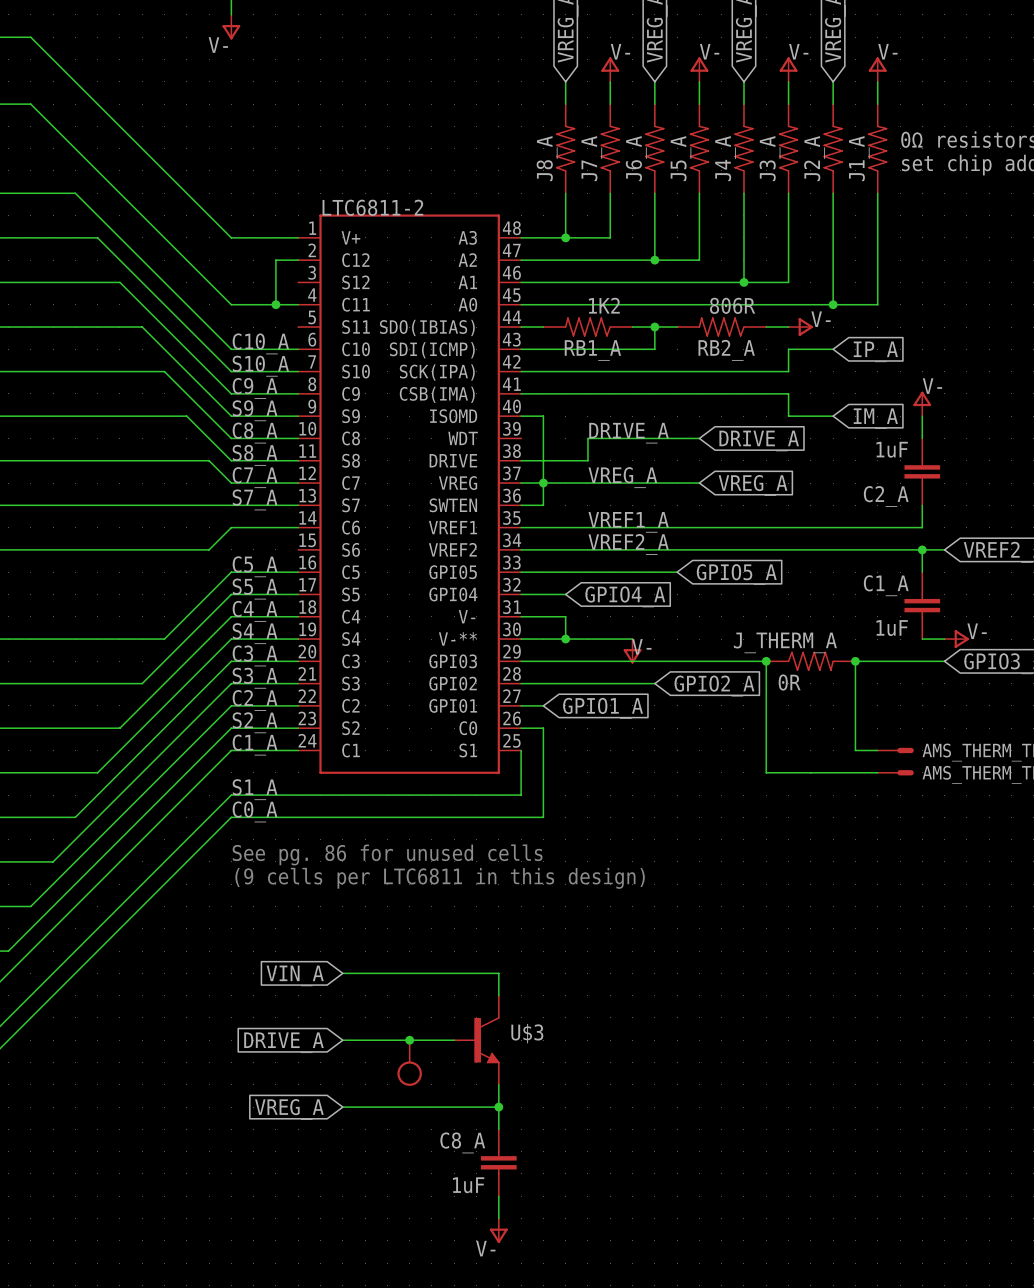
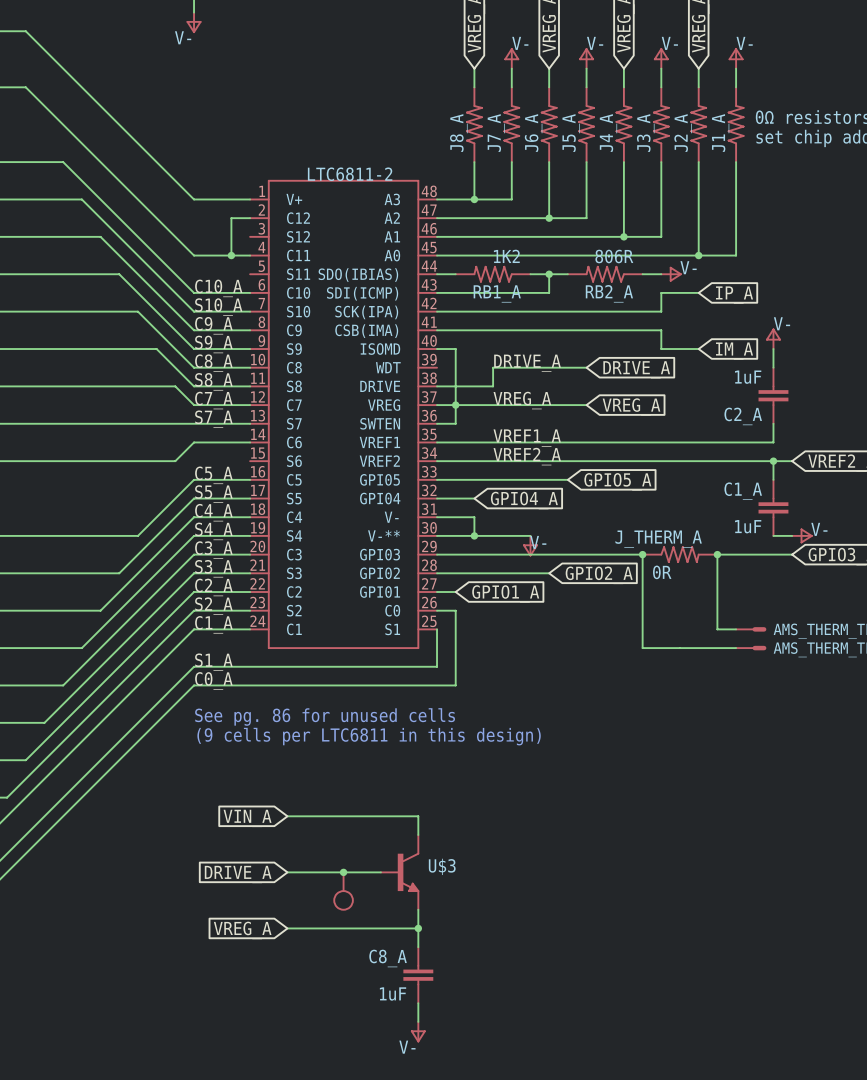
text position: LTC6811-2 (372, 207) -> LTC6811-2 (350, 174)

